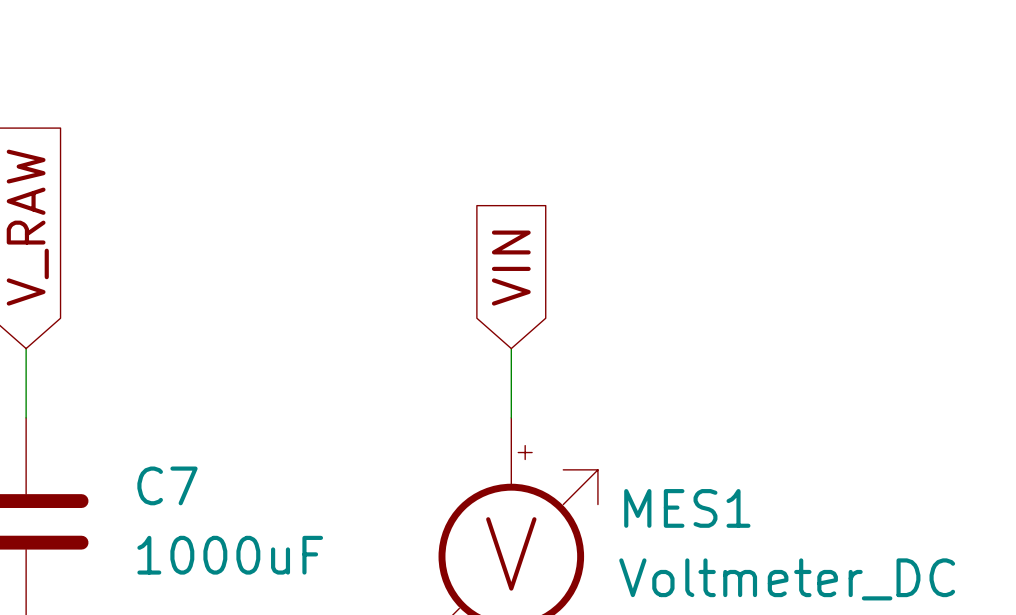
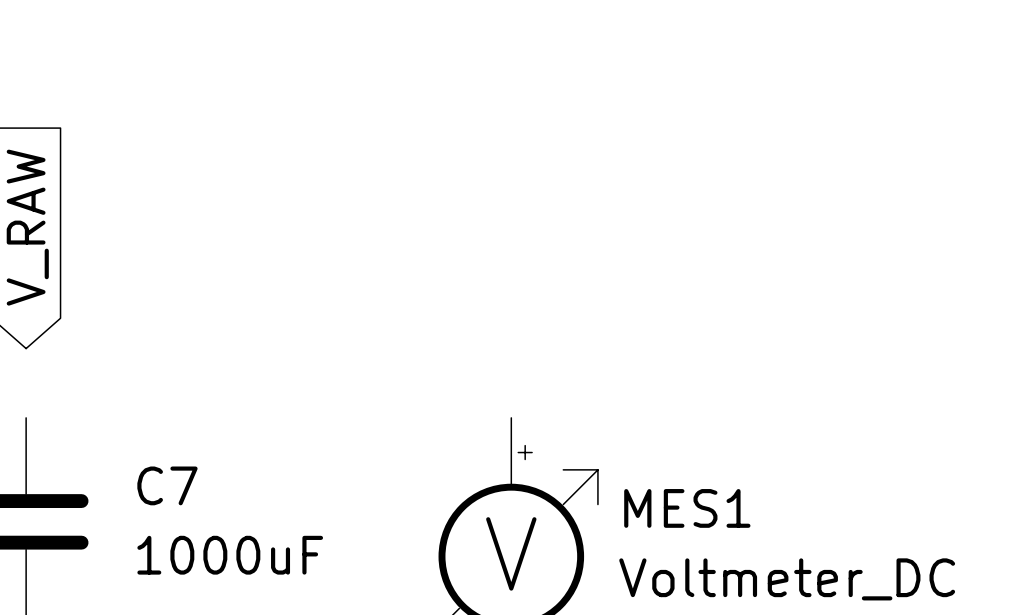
global label: VIN (511, 268) -> none
wire: (26, 348) (26, 417) -> none
wire: (511, 348) (511, 417) -> none

